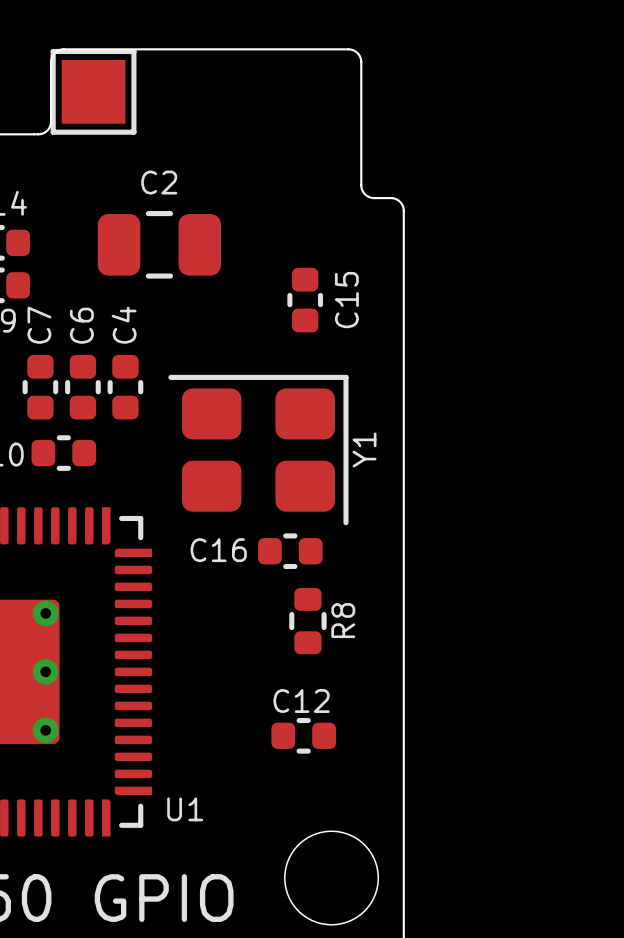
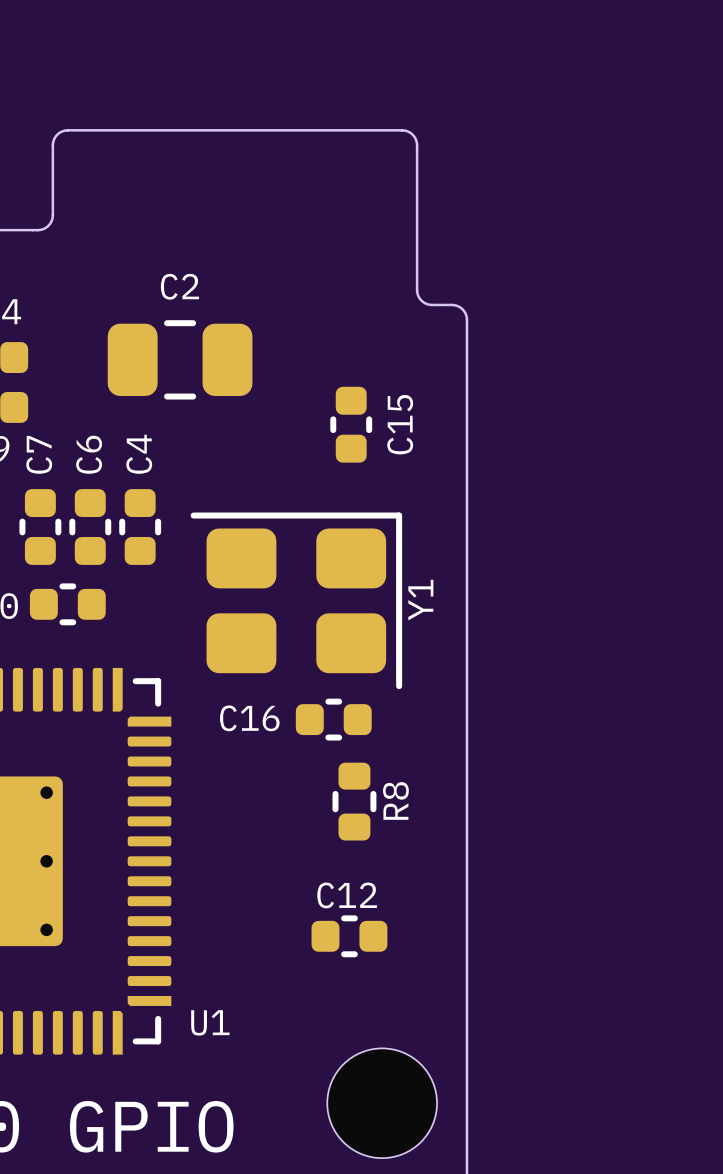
part: (93, 91) -> none

